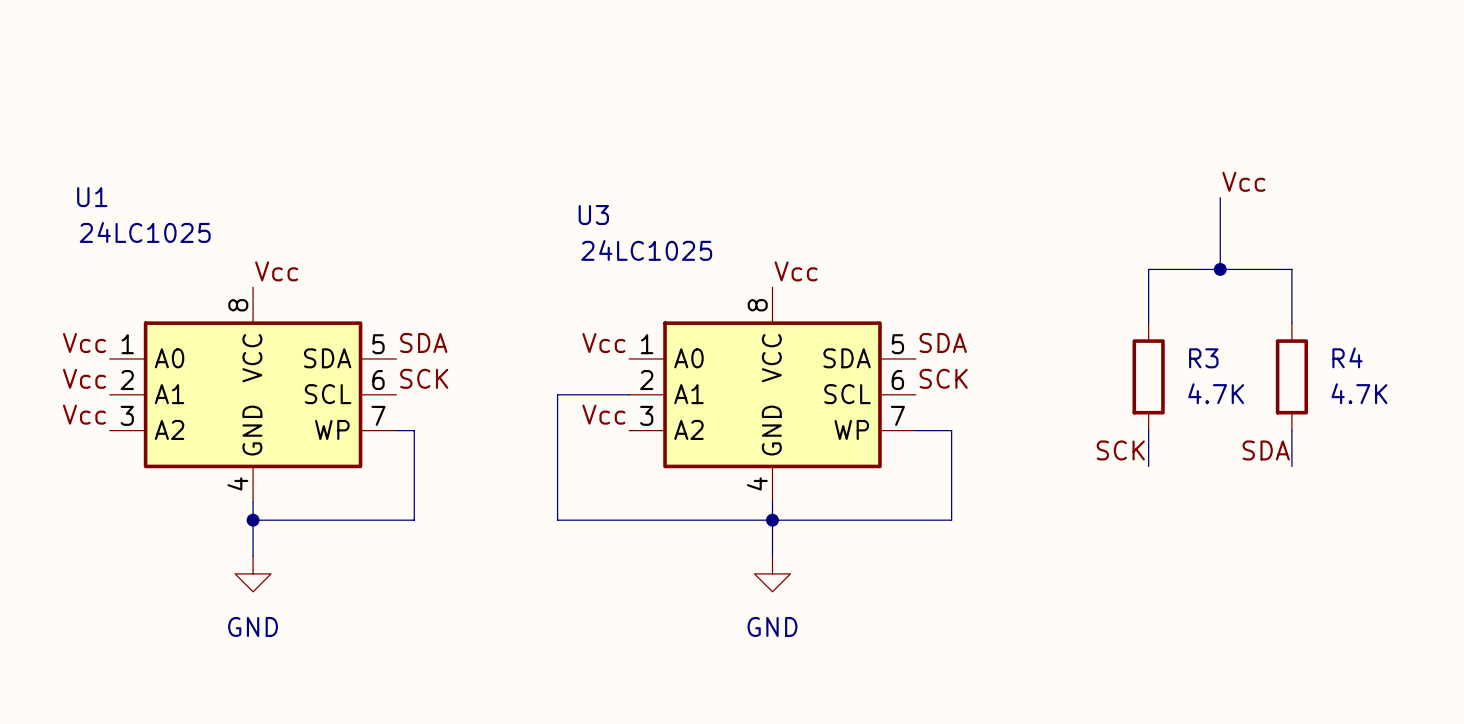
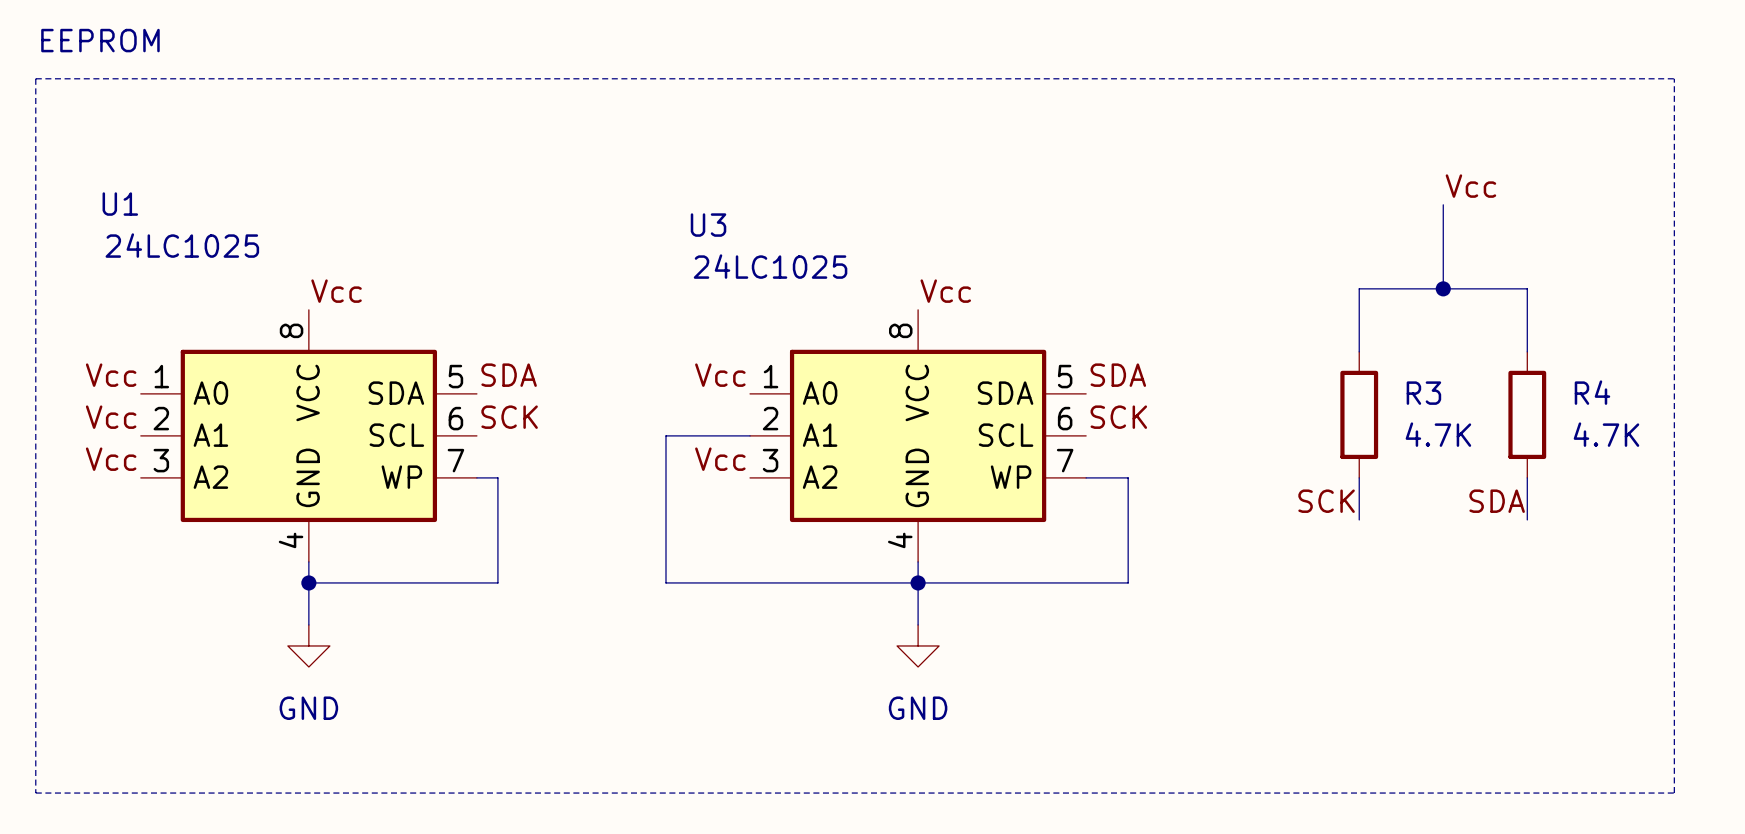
text: none -> EEPROM (100, 40)
line: none -> (35, 78) (35, 793) (1674, 793) (1674, 78) (35, 78)

